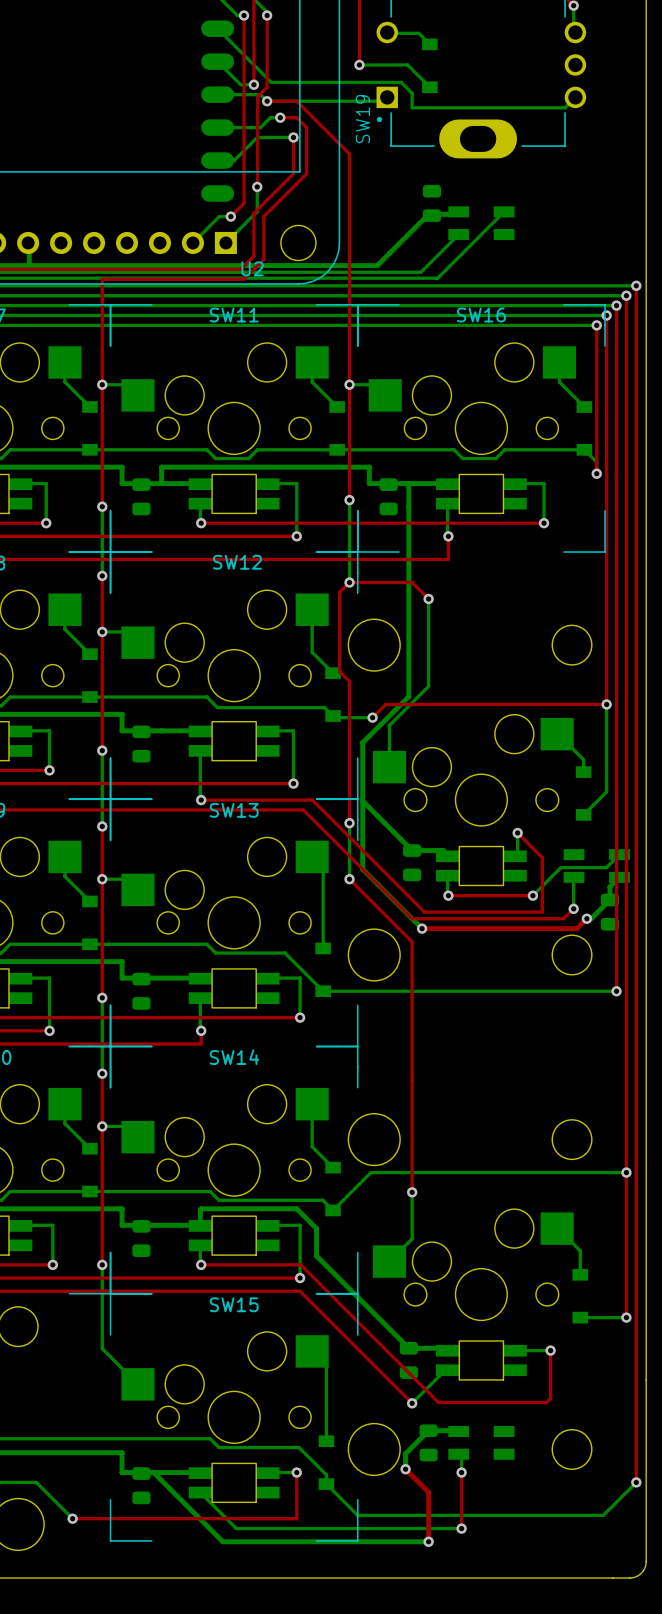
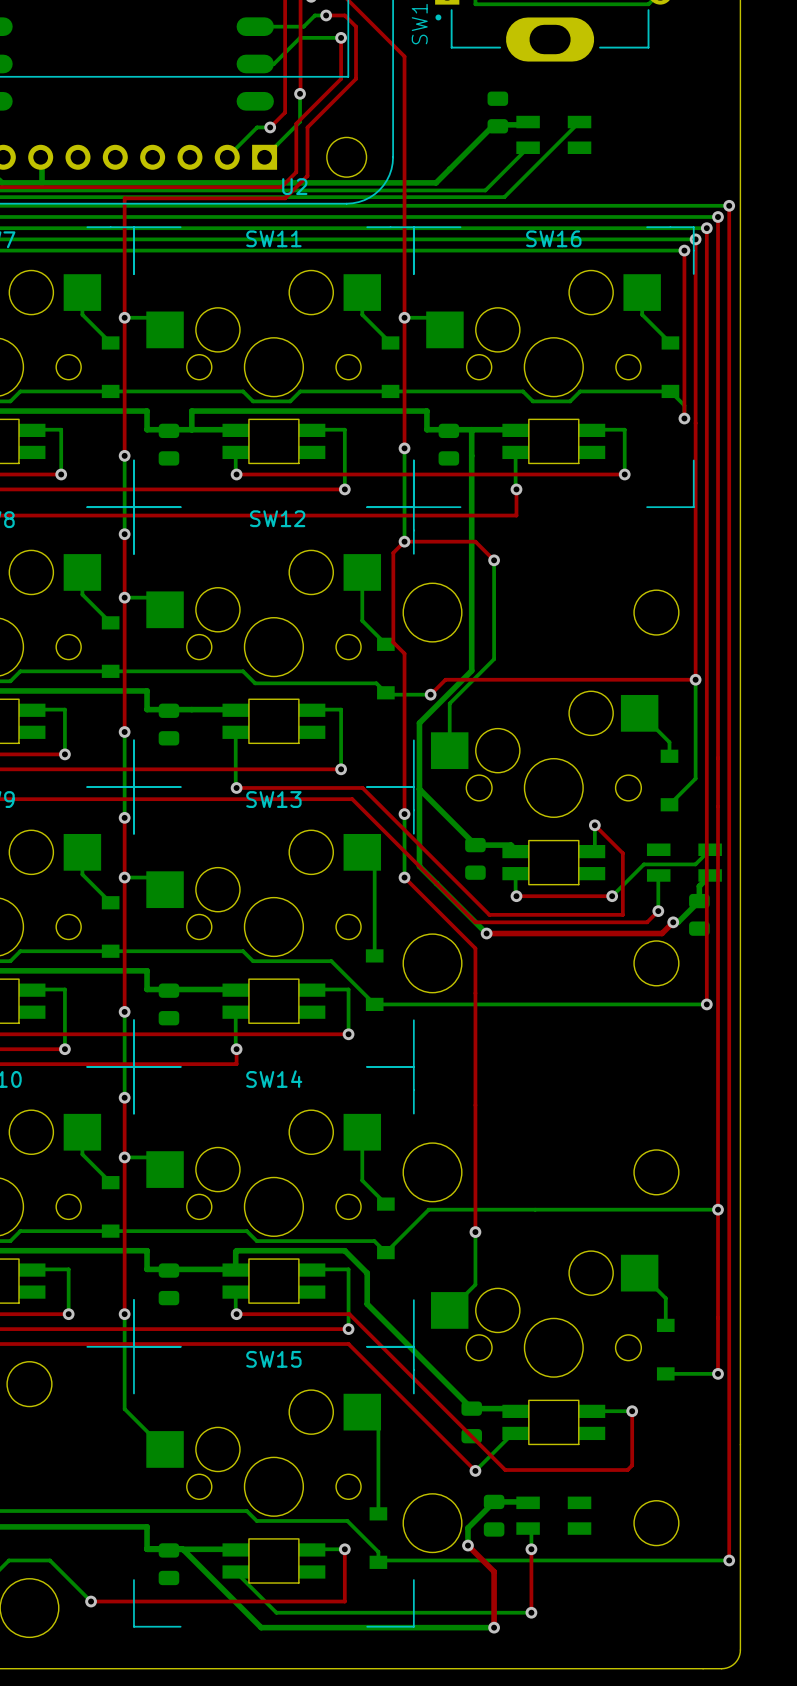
bottom track: (636, 1482) (603, 1515) (357, 1515) (326, 1484) -> (729, 1560) (380, 1560) (378, 1562)

